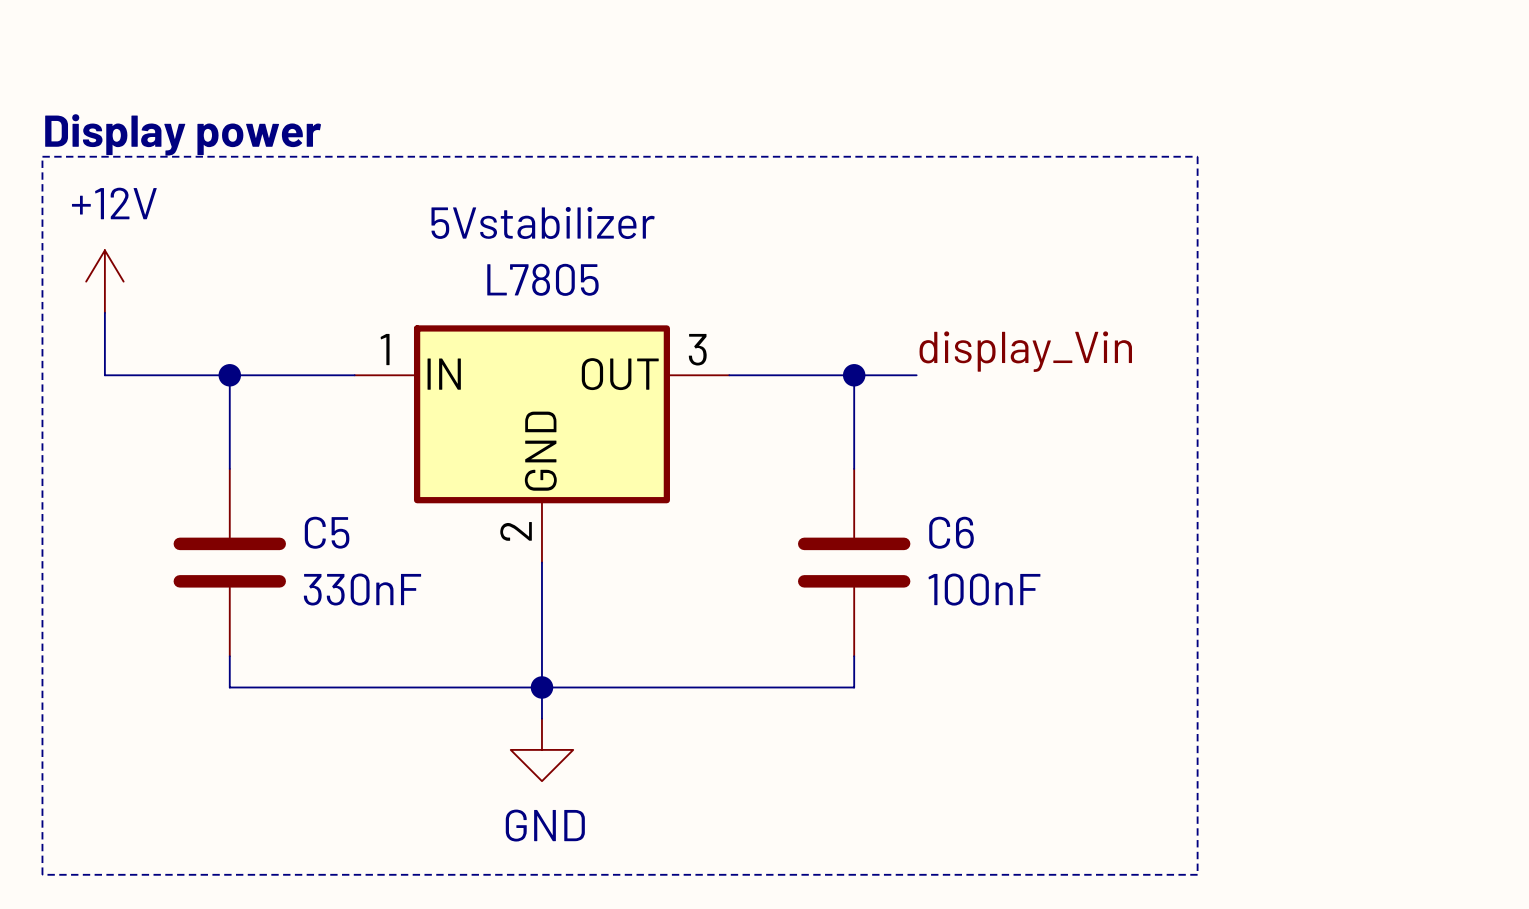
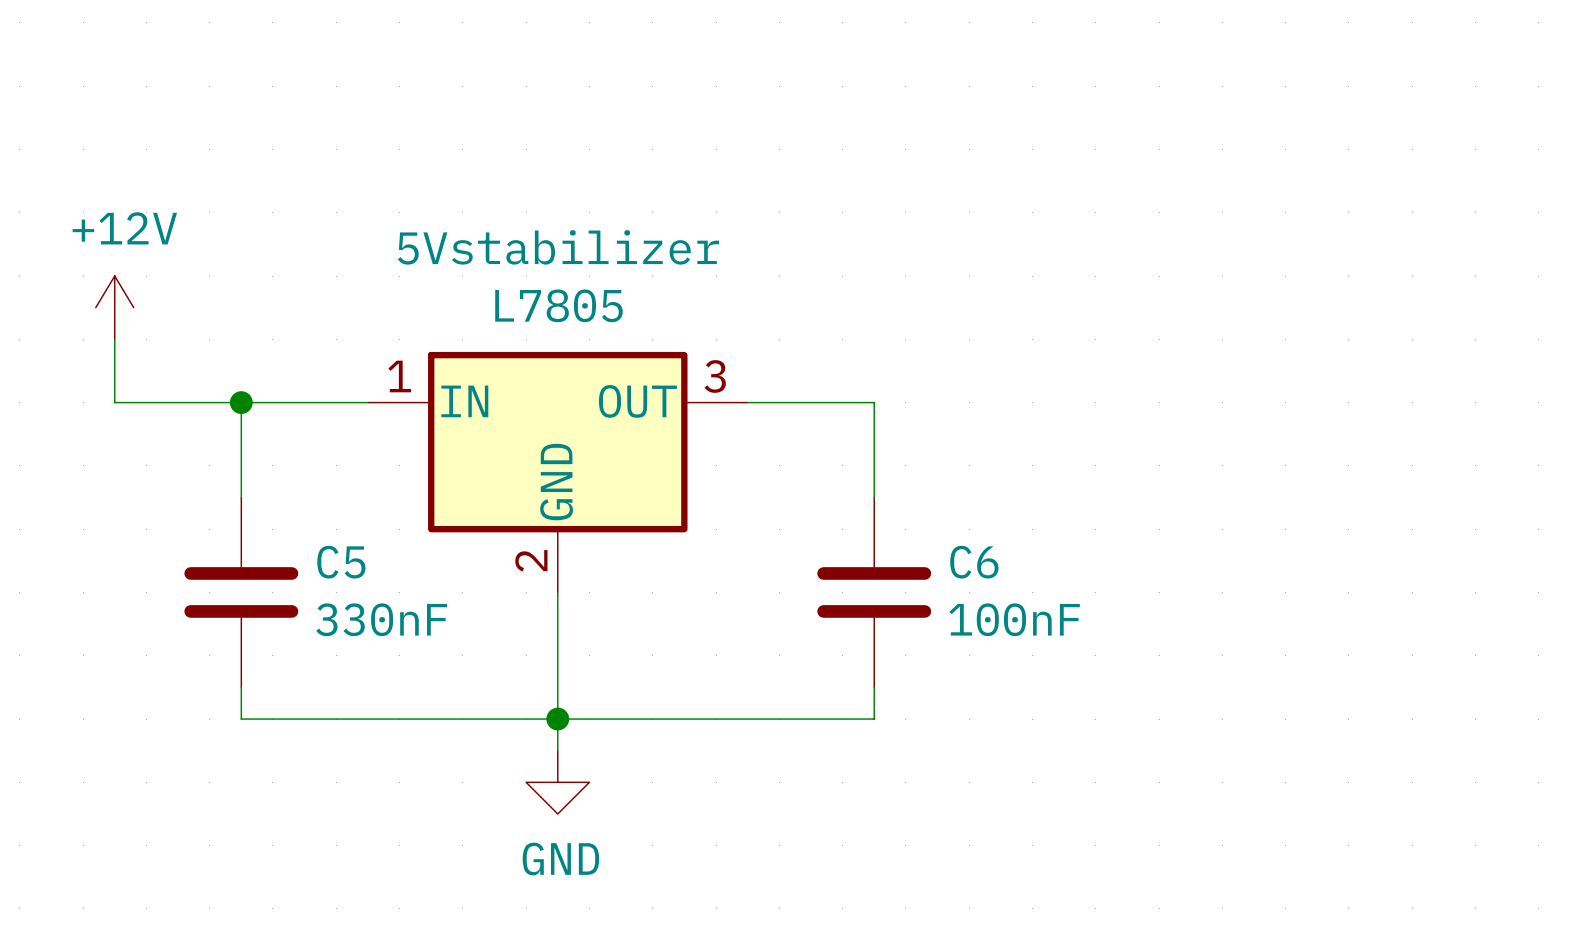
text: Display power (183, 134) -> none
line: (42, 156) (1197, 156) (1197, 874) (42, 874) (42, 156) -> none
label: display_Vin (1025, 351) -> none
wire: (854, 375) (916, 375) -> none
junction: (854, 375) -> none

